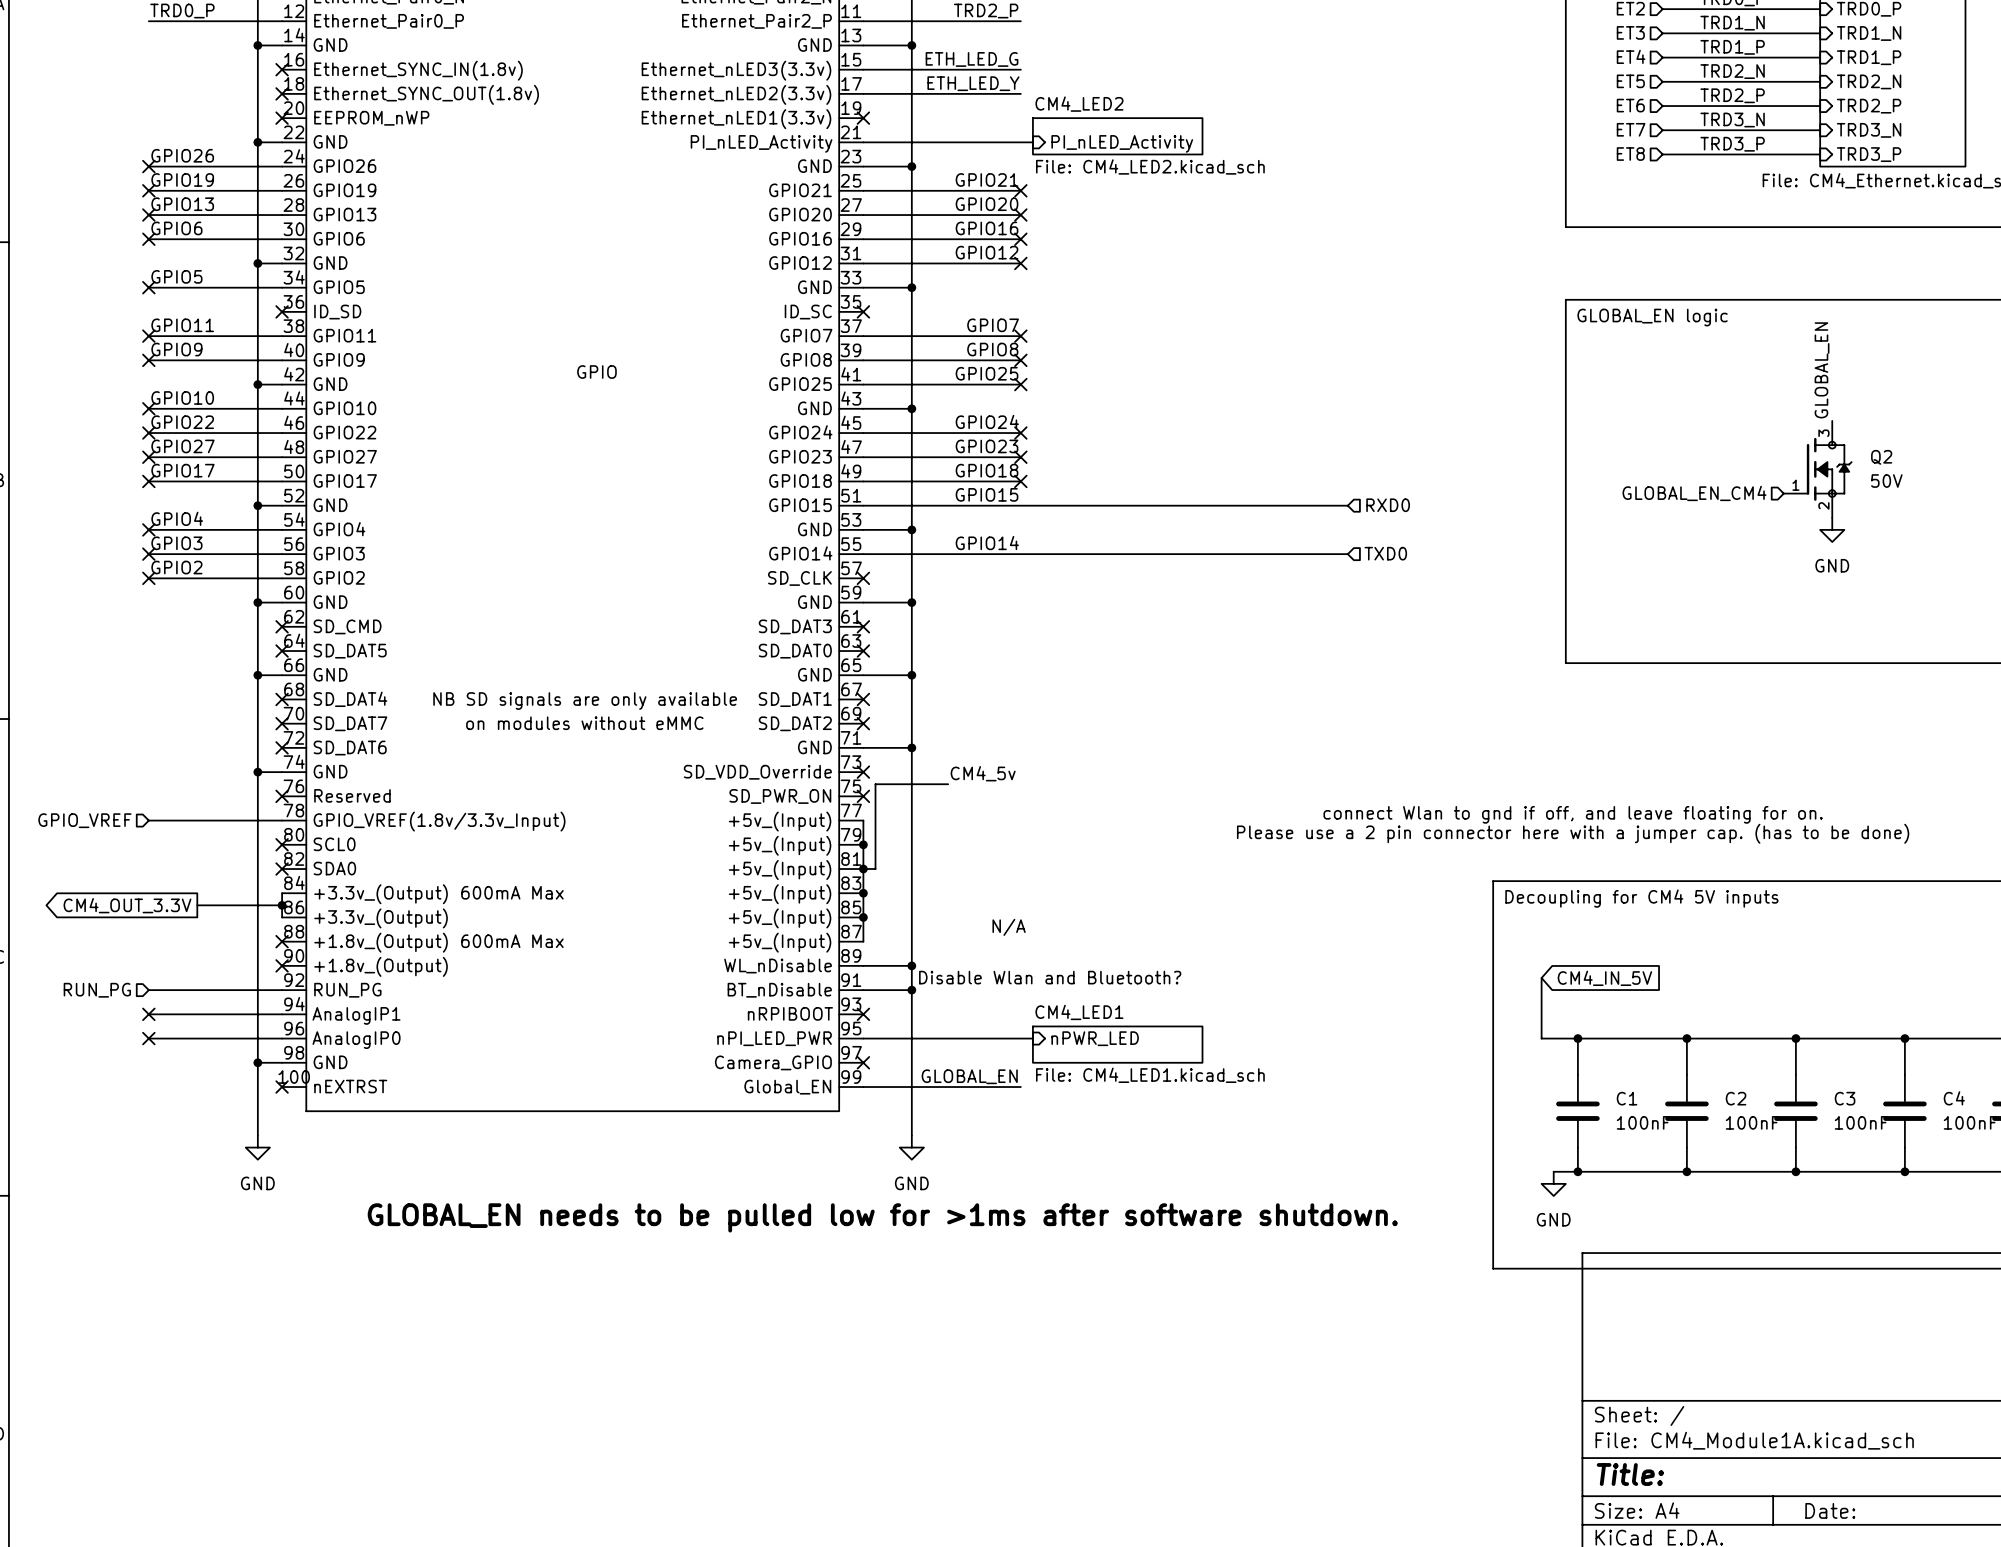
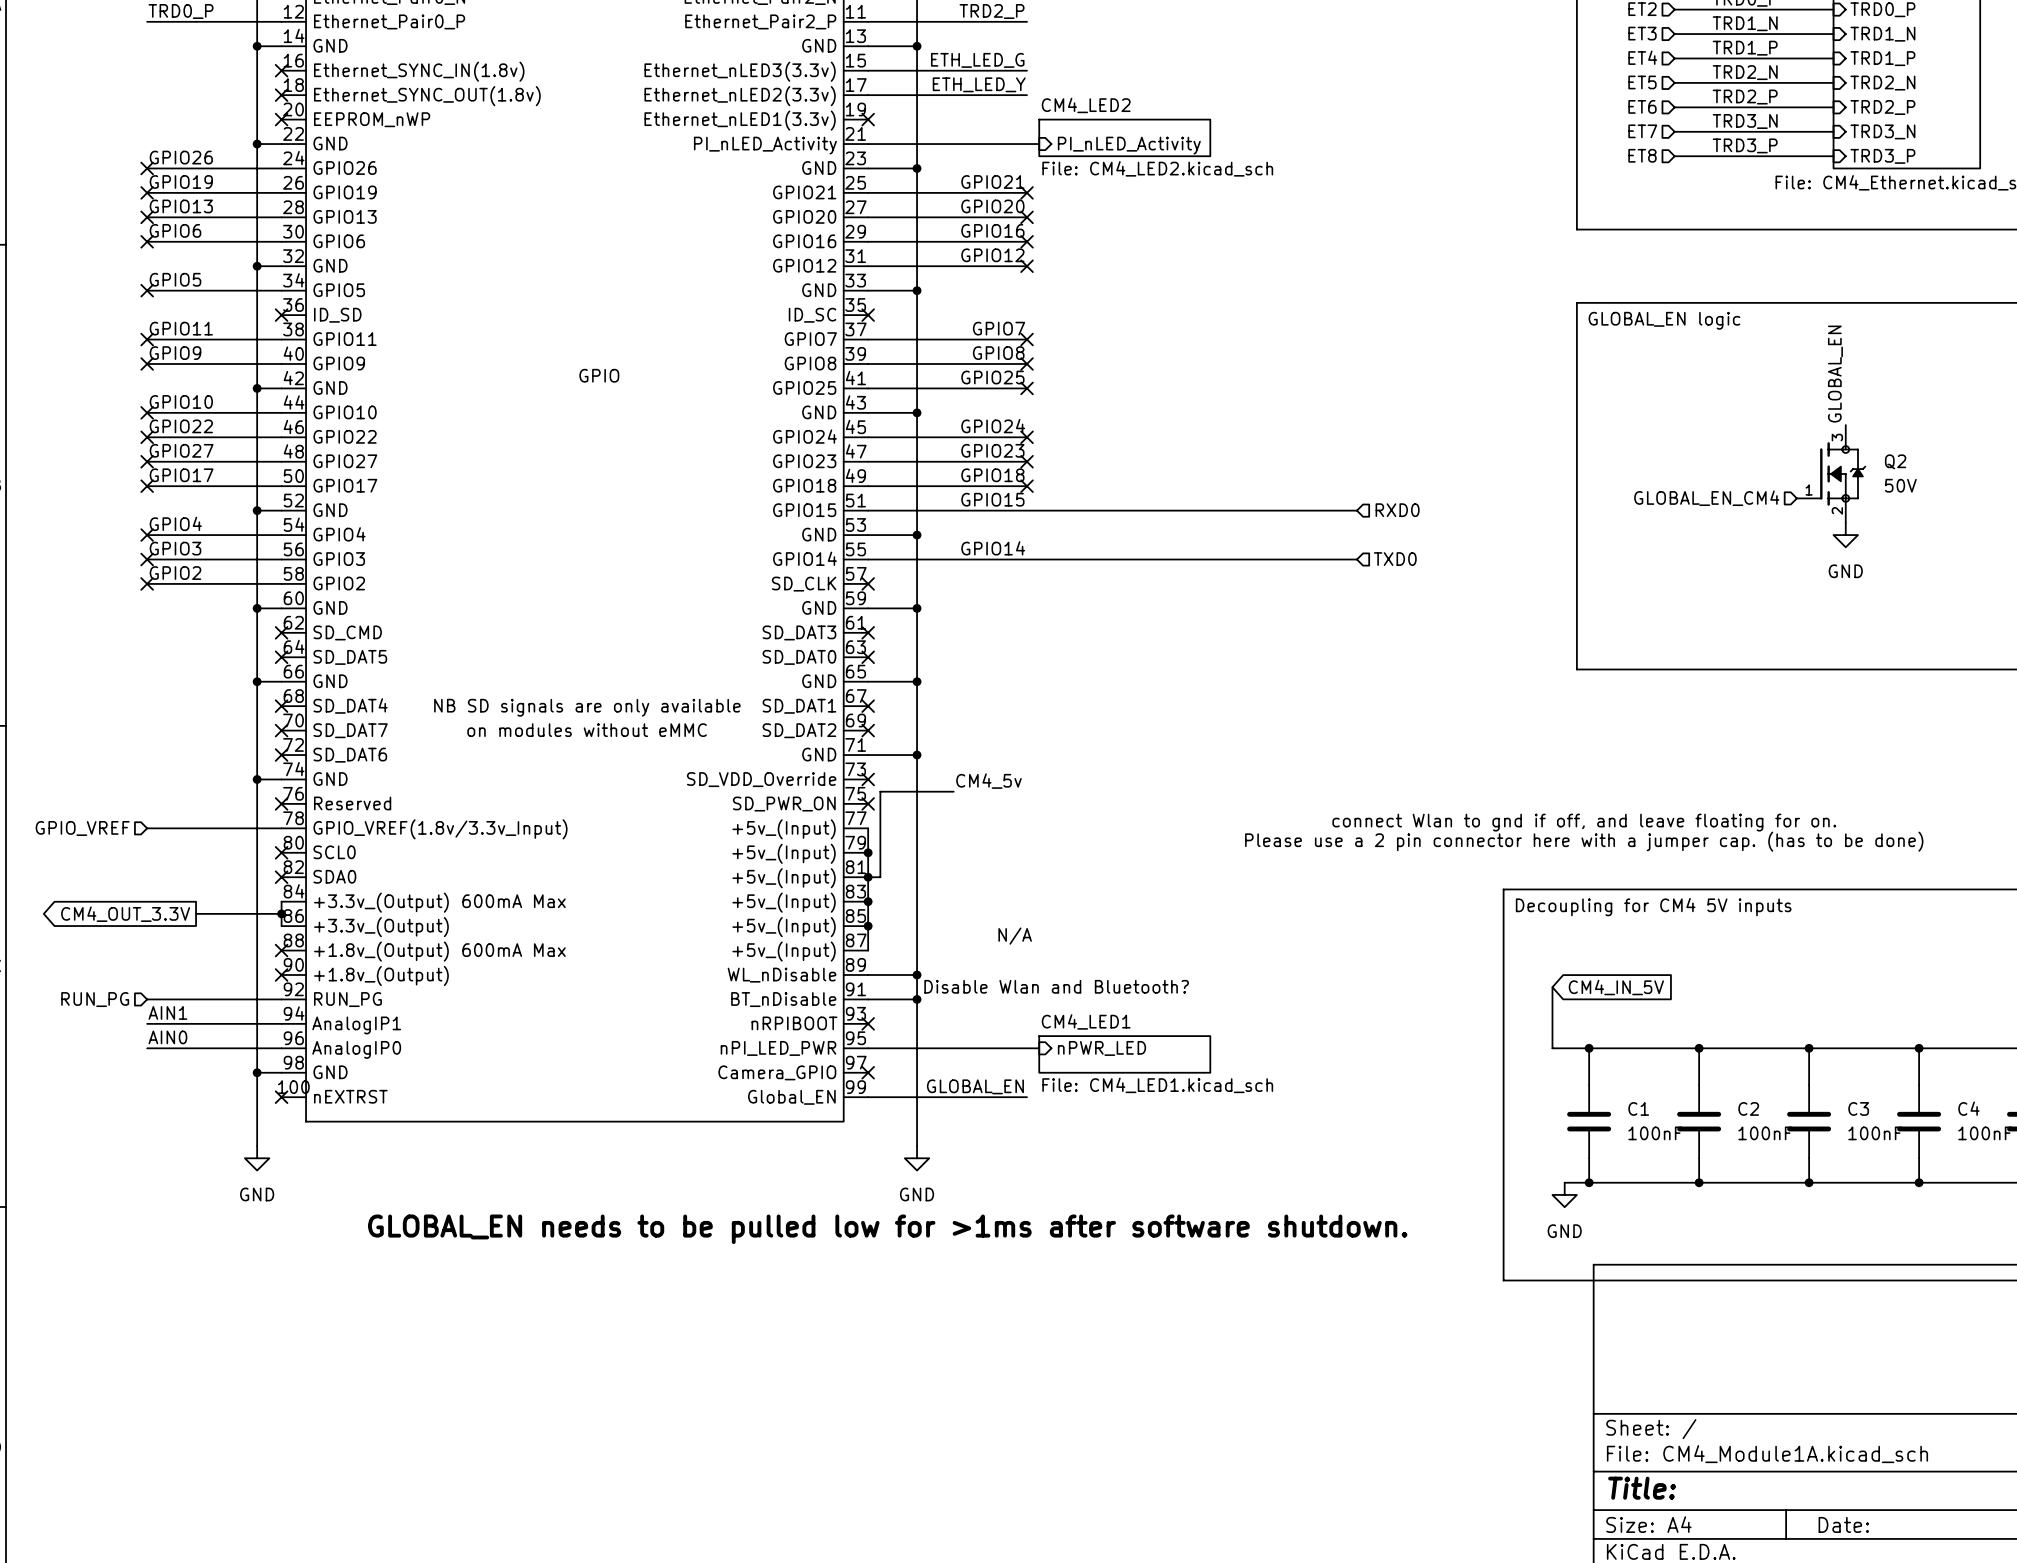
label: none -> AIN1 (167, 1012)
no-connect mark: (148, 1014) -> none
label: none -> AIN0 (167, 1037)
no-connect mark: (148, 1038) -> none

